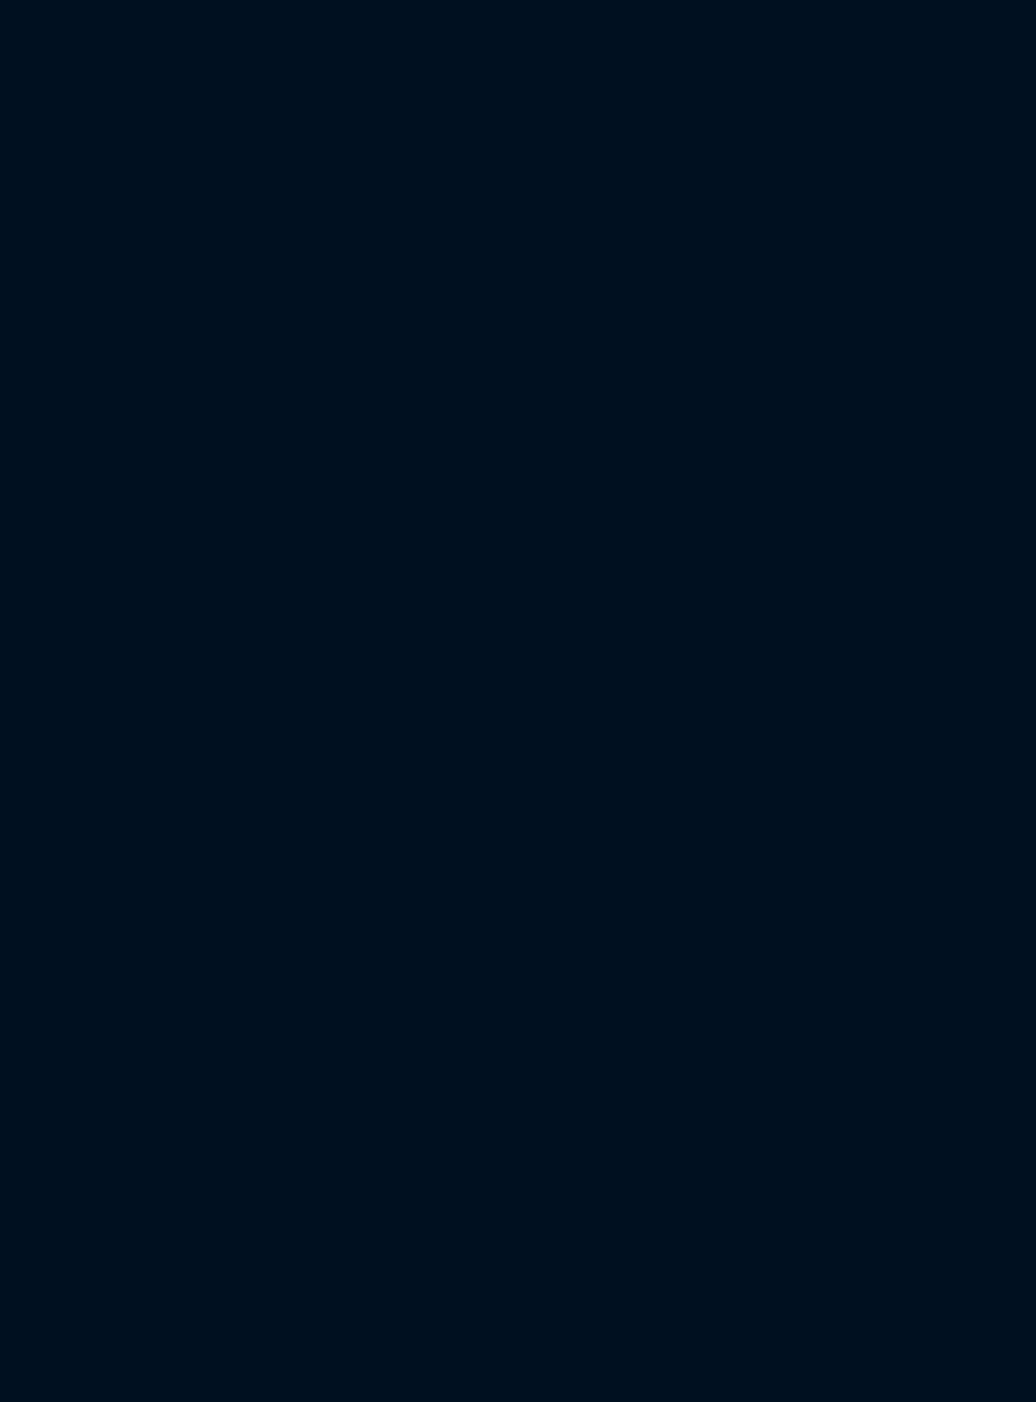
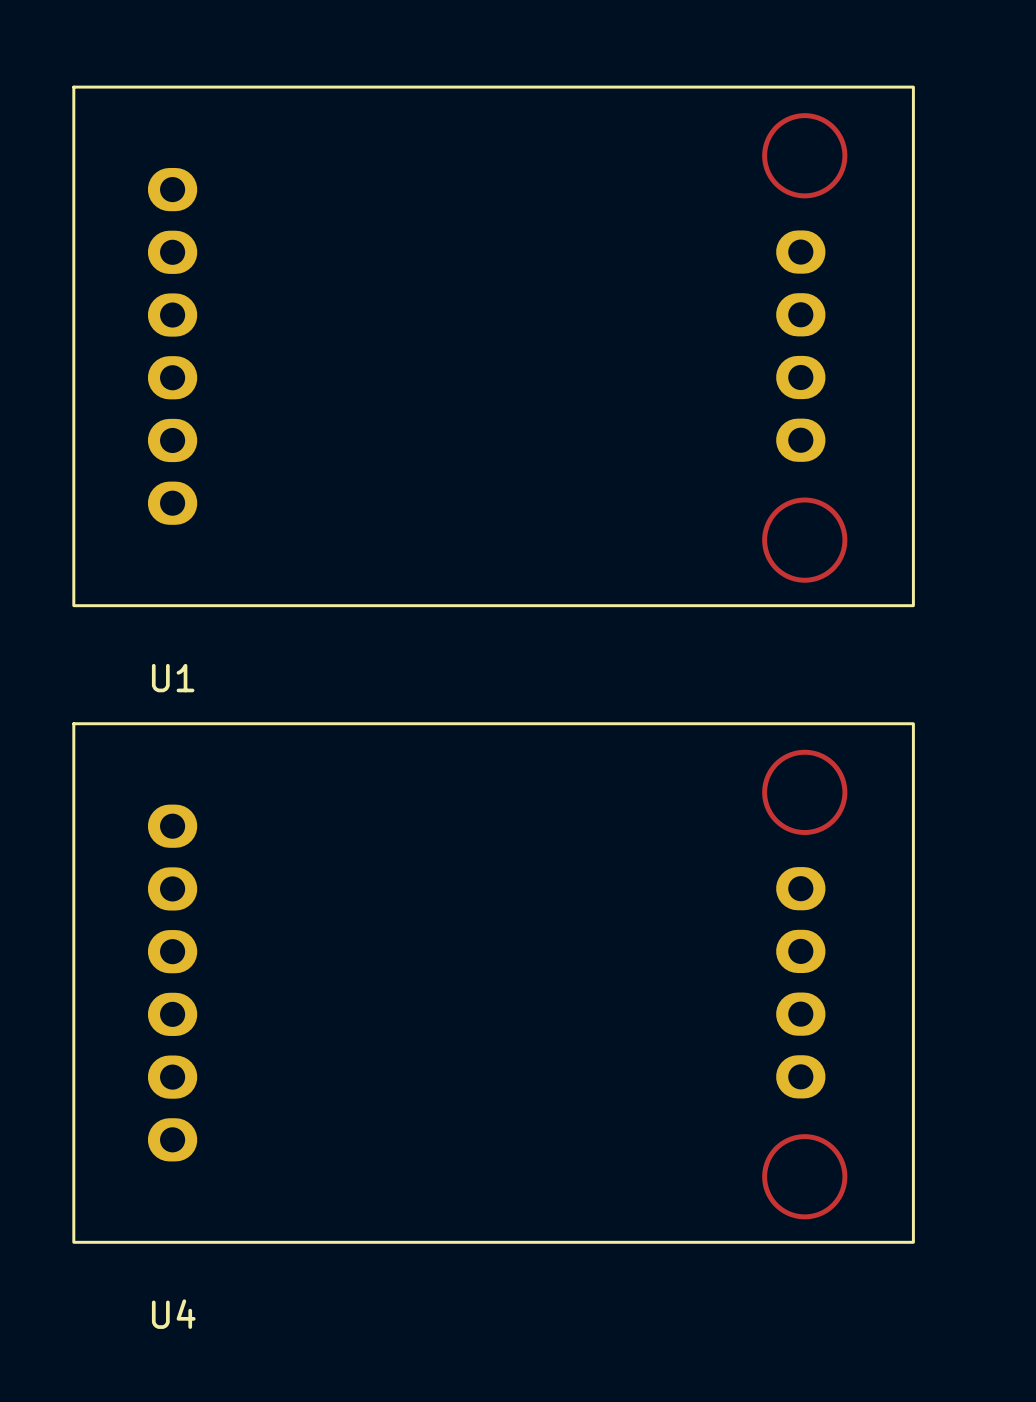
U1: none -> (493, 346)
U4: none -> (493, 983)

